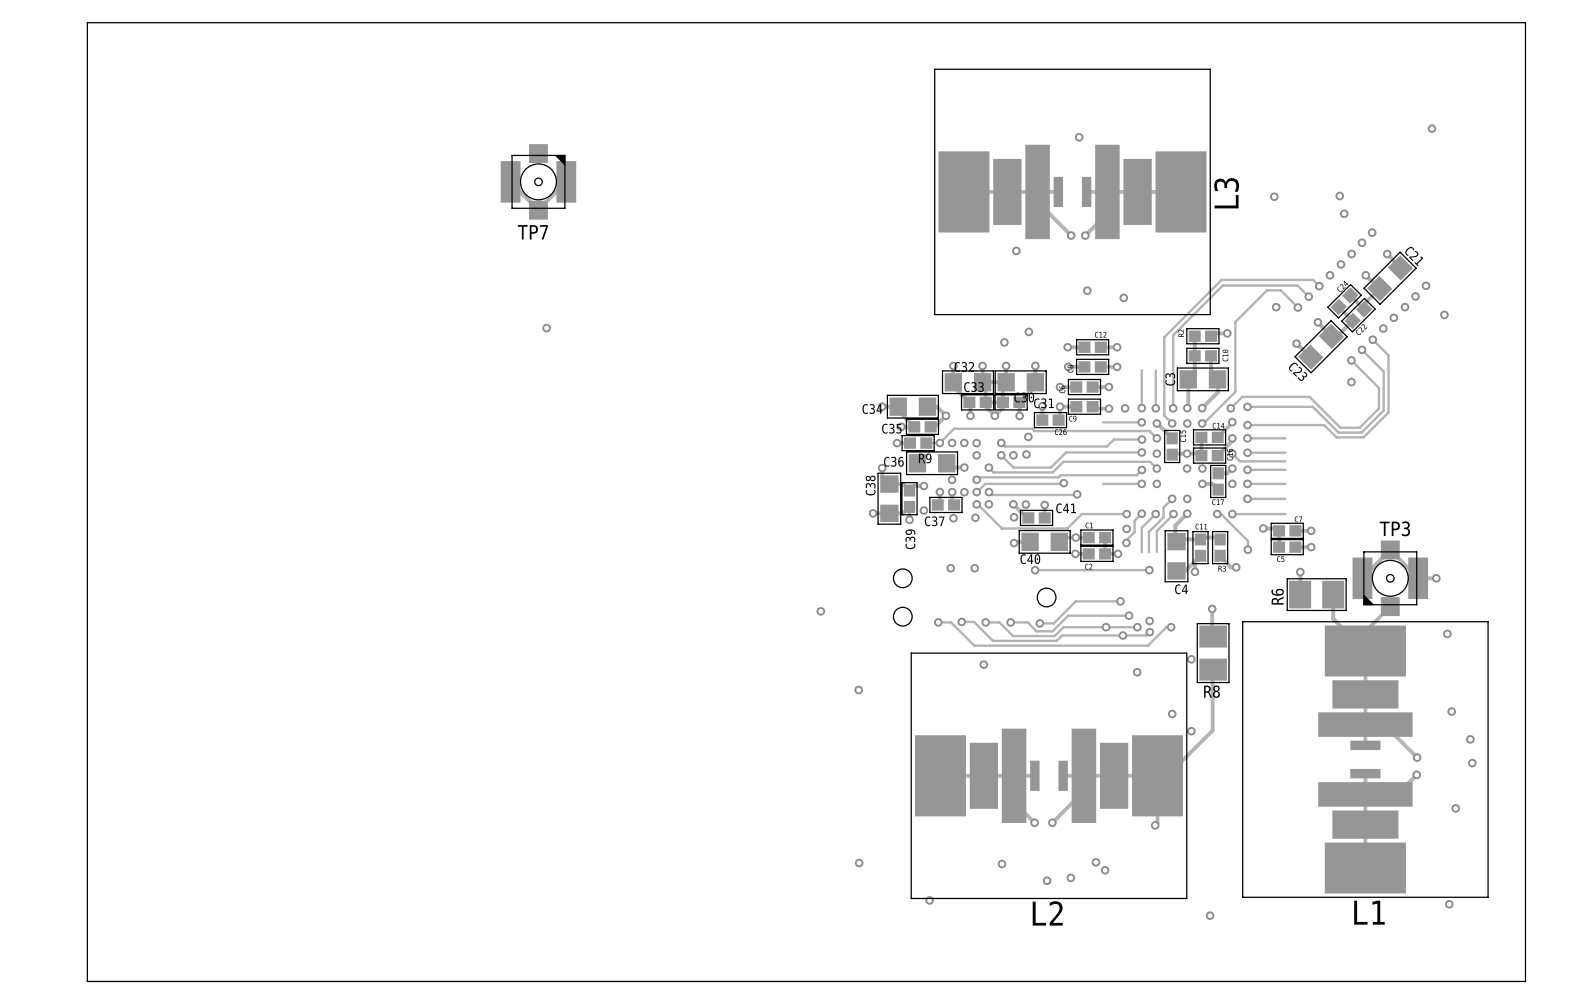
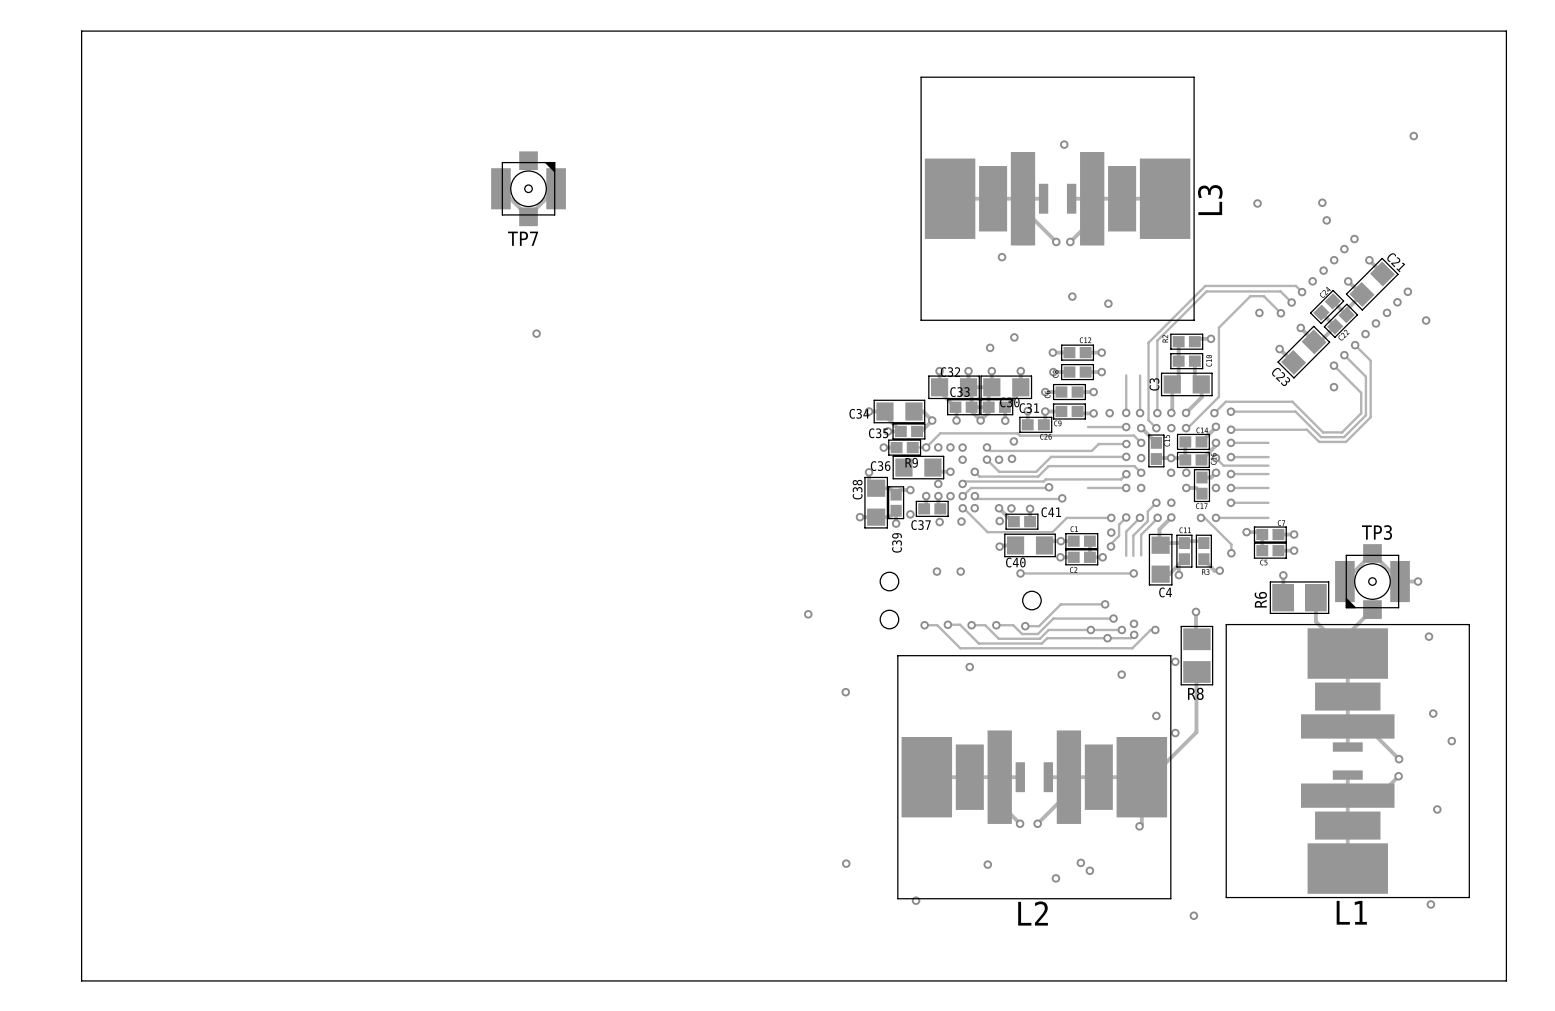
via: (1472, 763) -> none
via: (1047, 880) -> none

